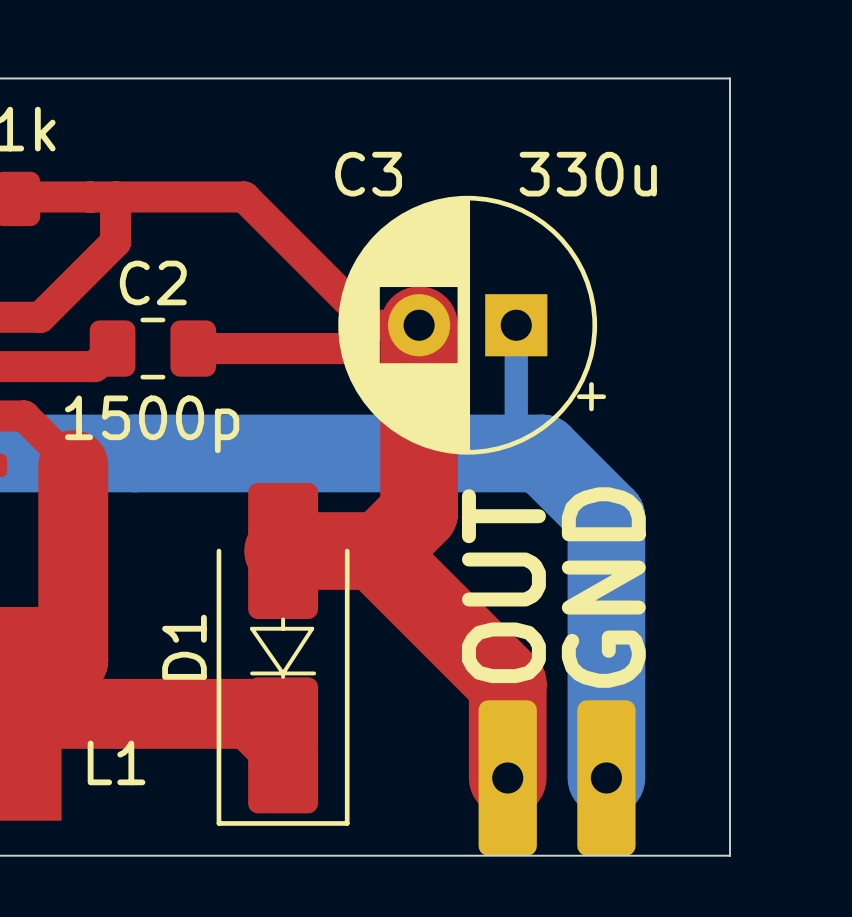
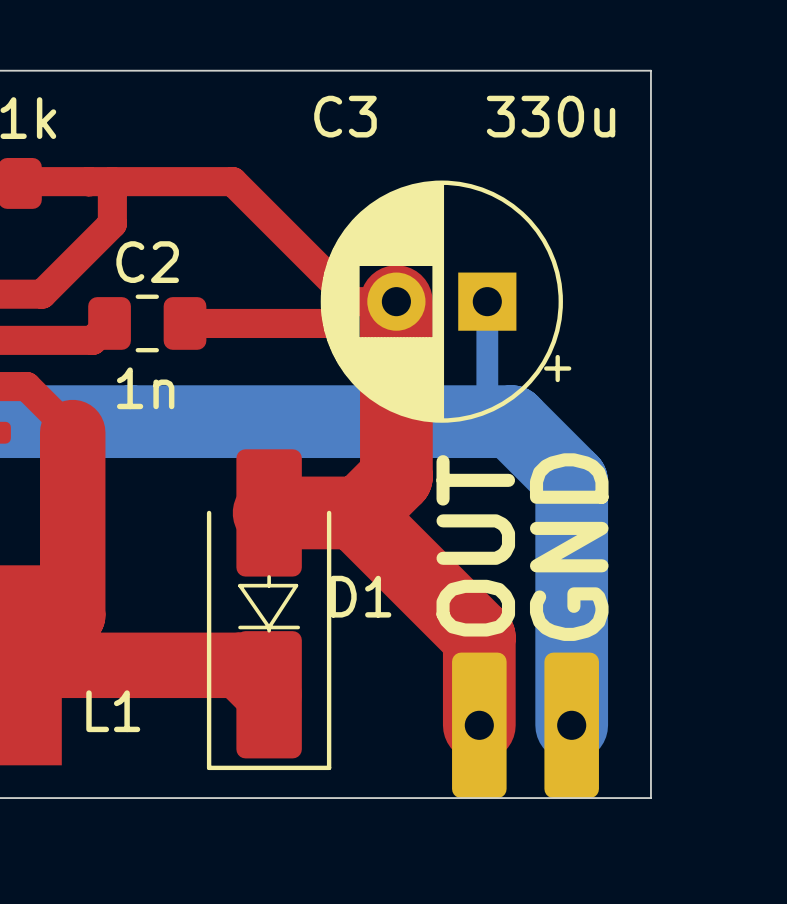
board edge: (691, 78) (730, 78) (730, 855) (691, 855) -> (650, 70) (650, 798)
C3 name position: C3 (368, 174) -> C3 (345, 116)
C3 value position: 330u (588, 174) -> 330u (551, 116)
C2 value: 1500p (152, 424) -> 1n (145, 388)
D1 name rotation: 0° (184, 647) -> 90° clockwise (360, 596)
D1 name position: D1 (184, 647) -> D1 (360, 596)

